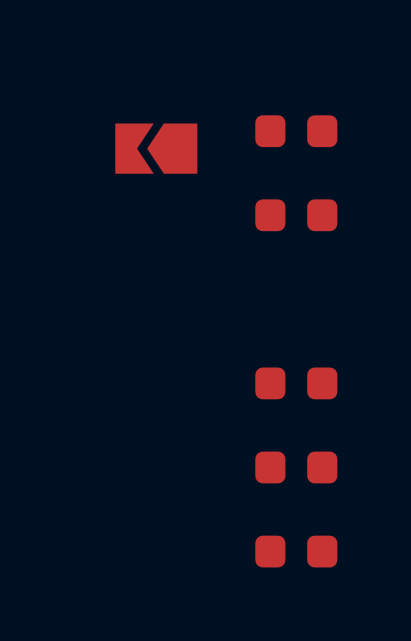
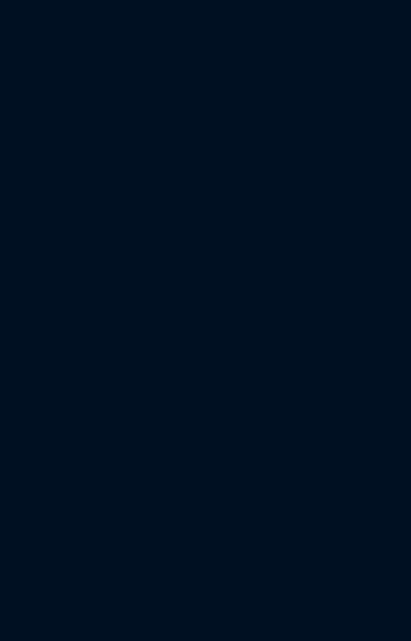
part: (296, 131) -> none
part: (156, 148) -> none
part: (296, 215) -> none
part: (296, 383) -> none
part: (296, 467) -> none
part: (296, 551) -> none

